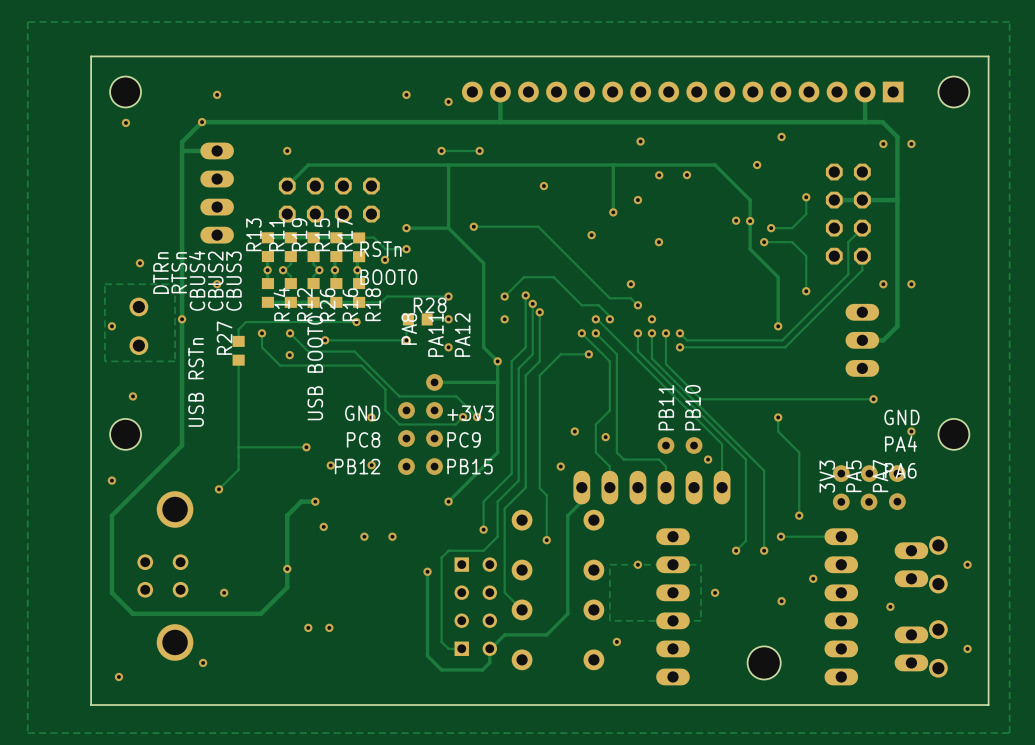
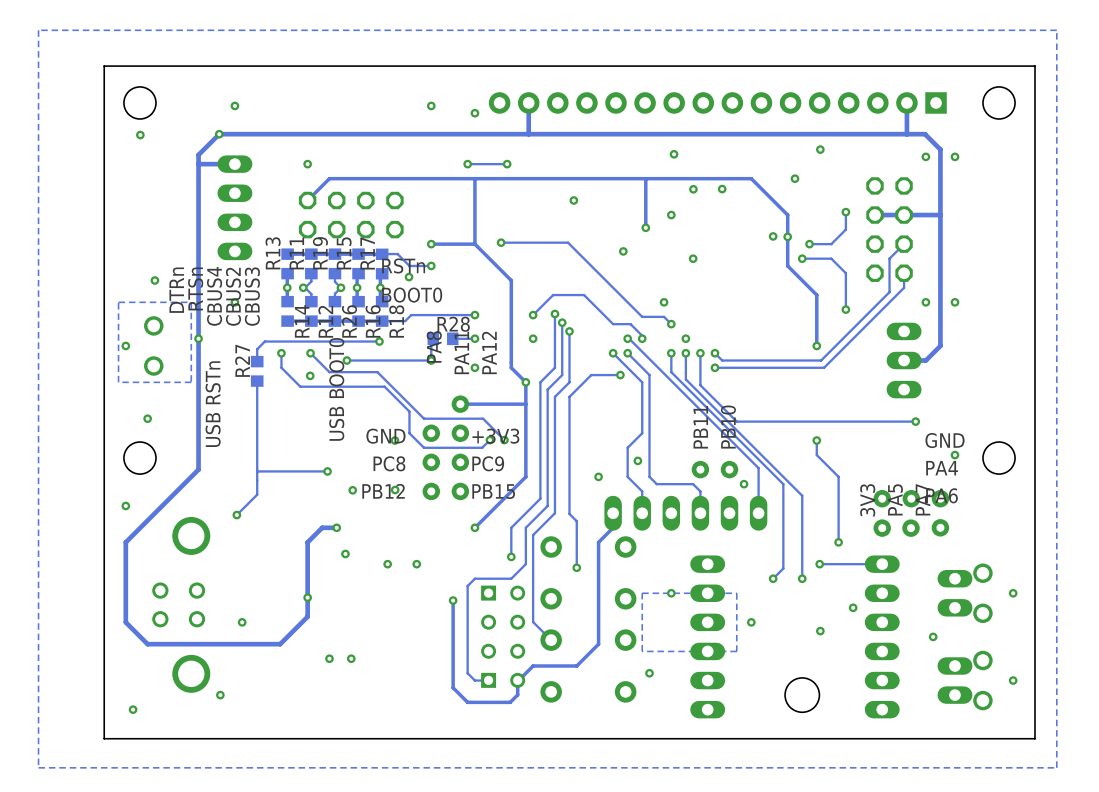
via: (574, 431) -> none
via: none -> (598, 476)
via: (560, 466) -> none

